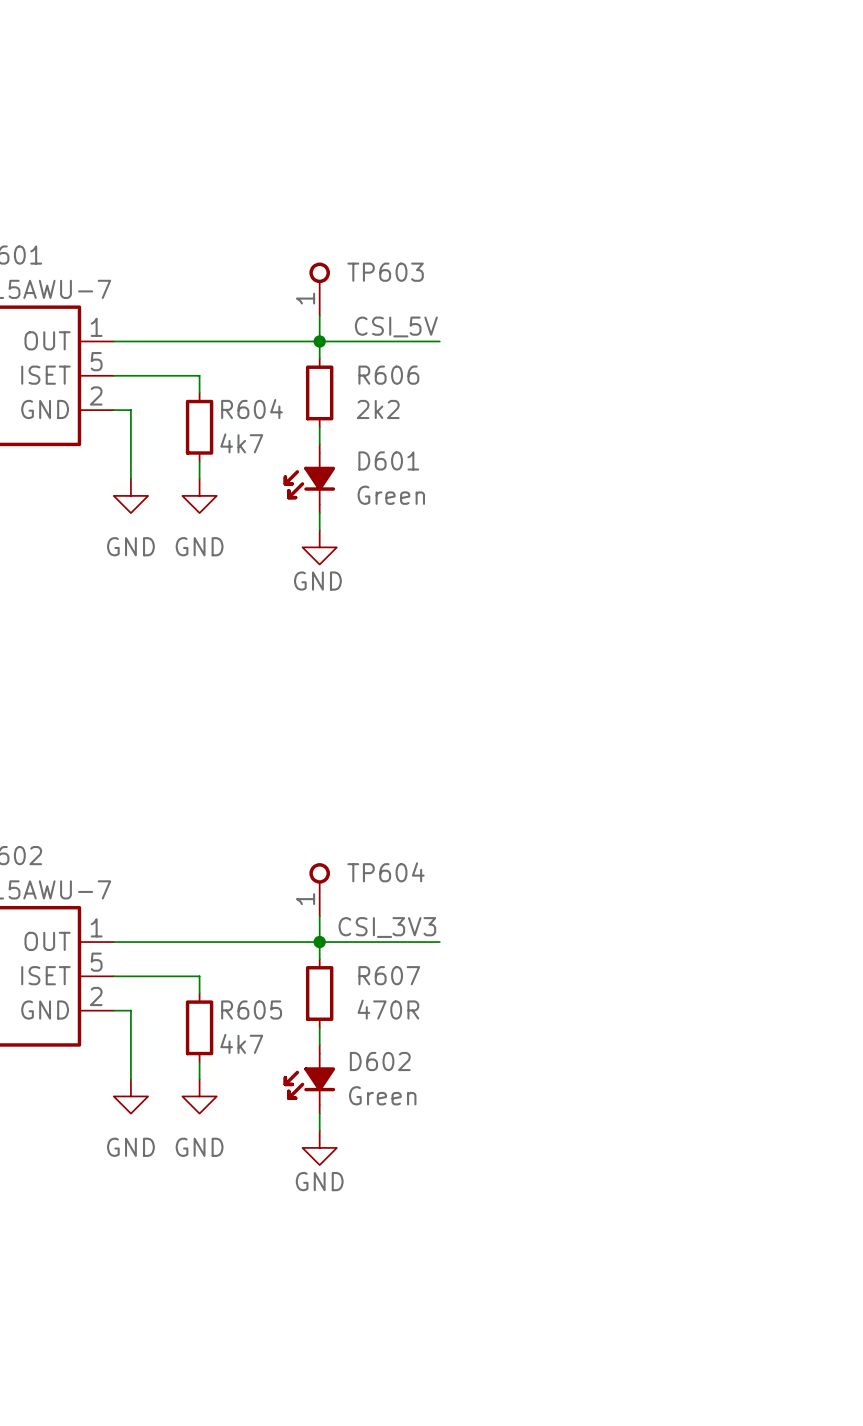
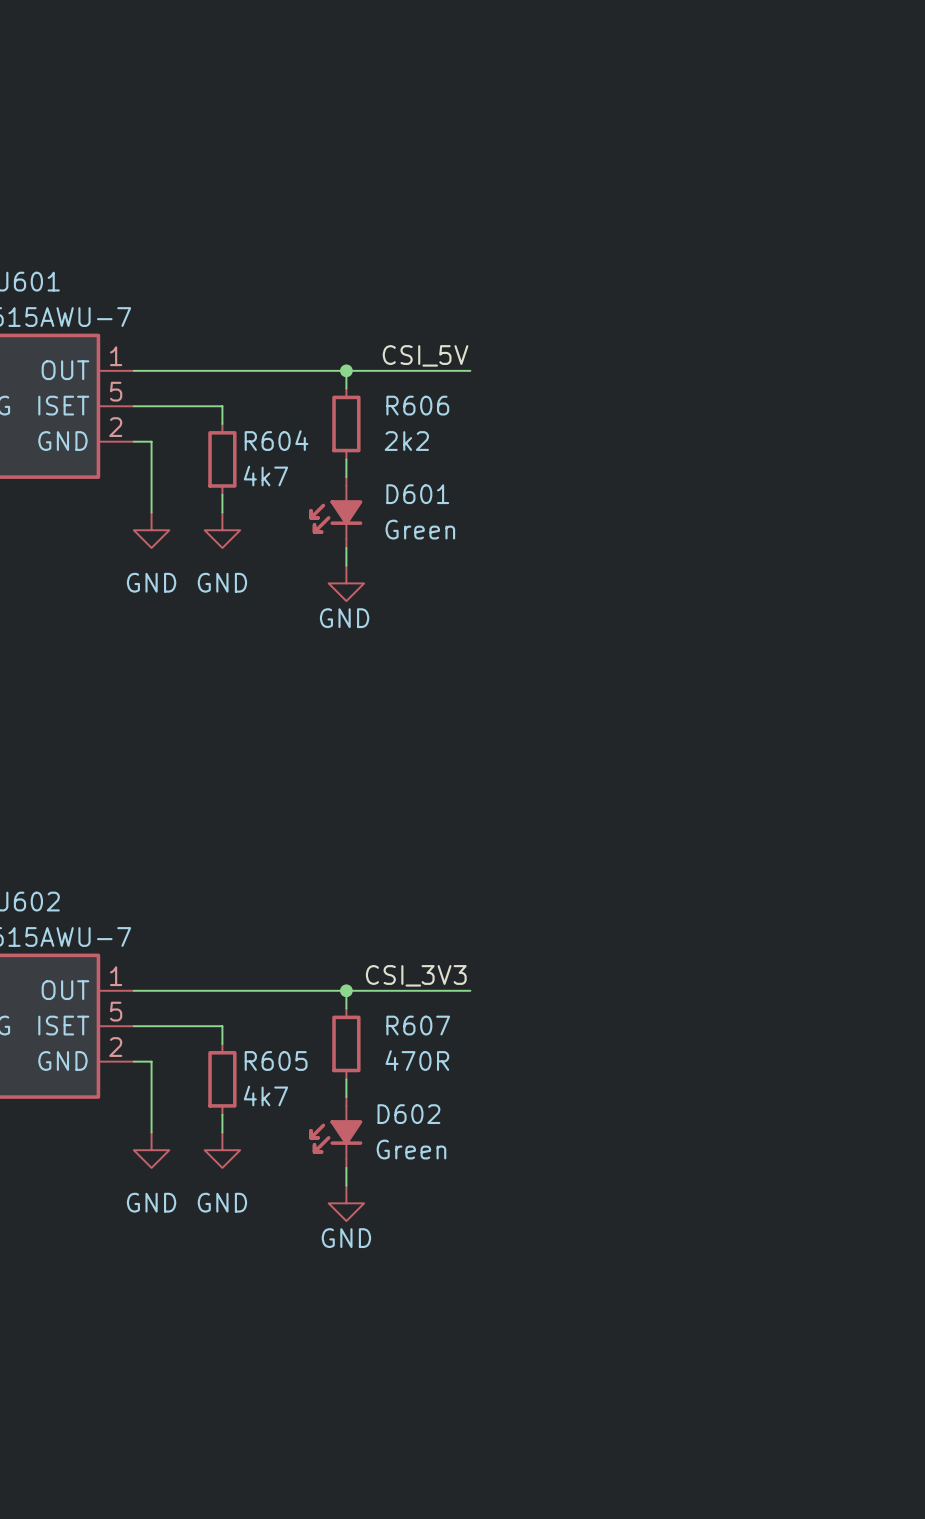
TP603: (319, 289) -> none
wire: (319, 315) (319, 341) -> none
TP604: (319, 889) -> none
wire: (319, 916) (319, 942) -> none

